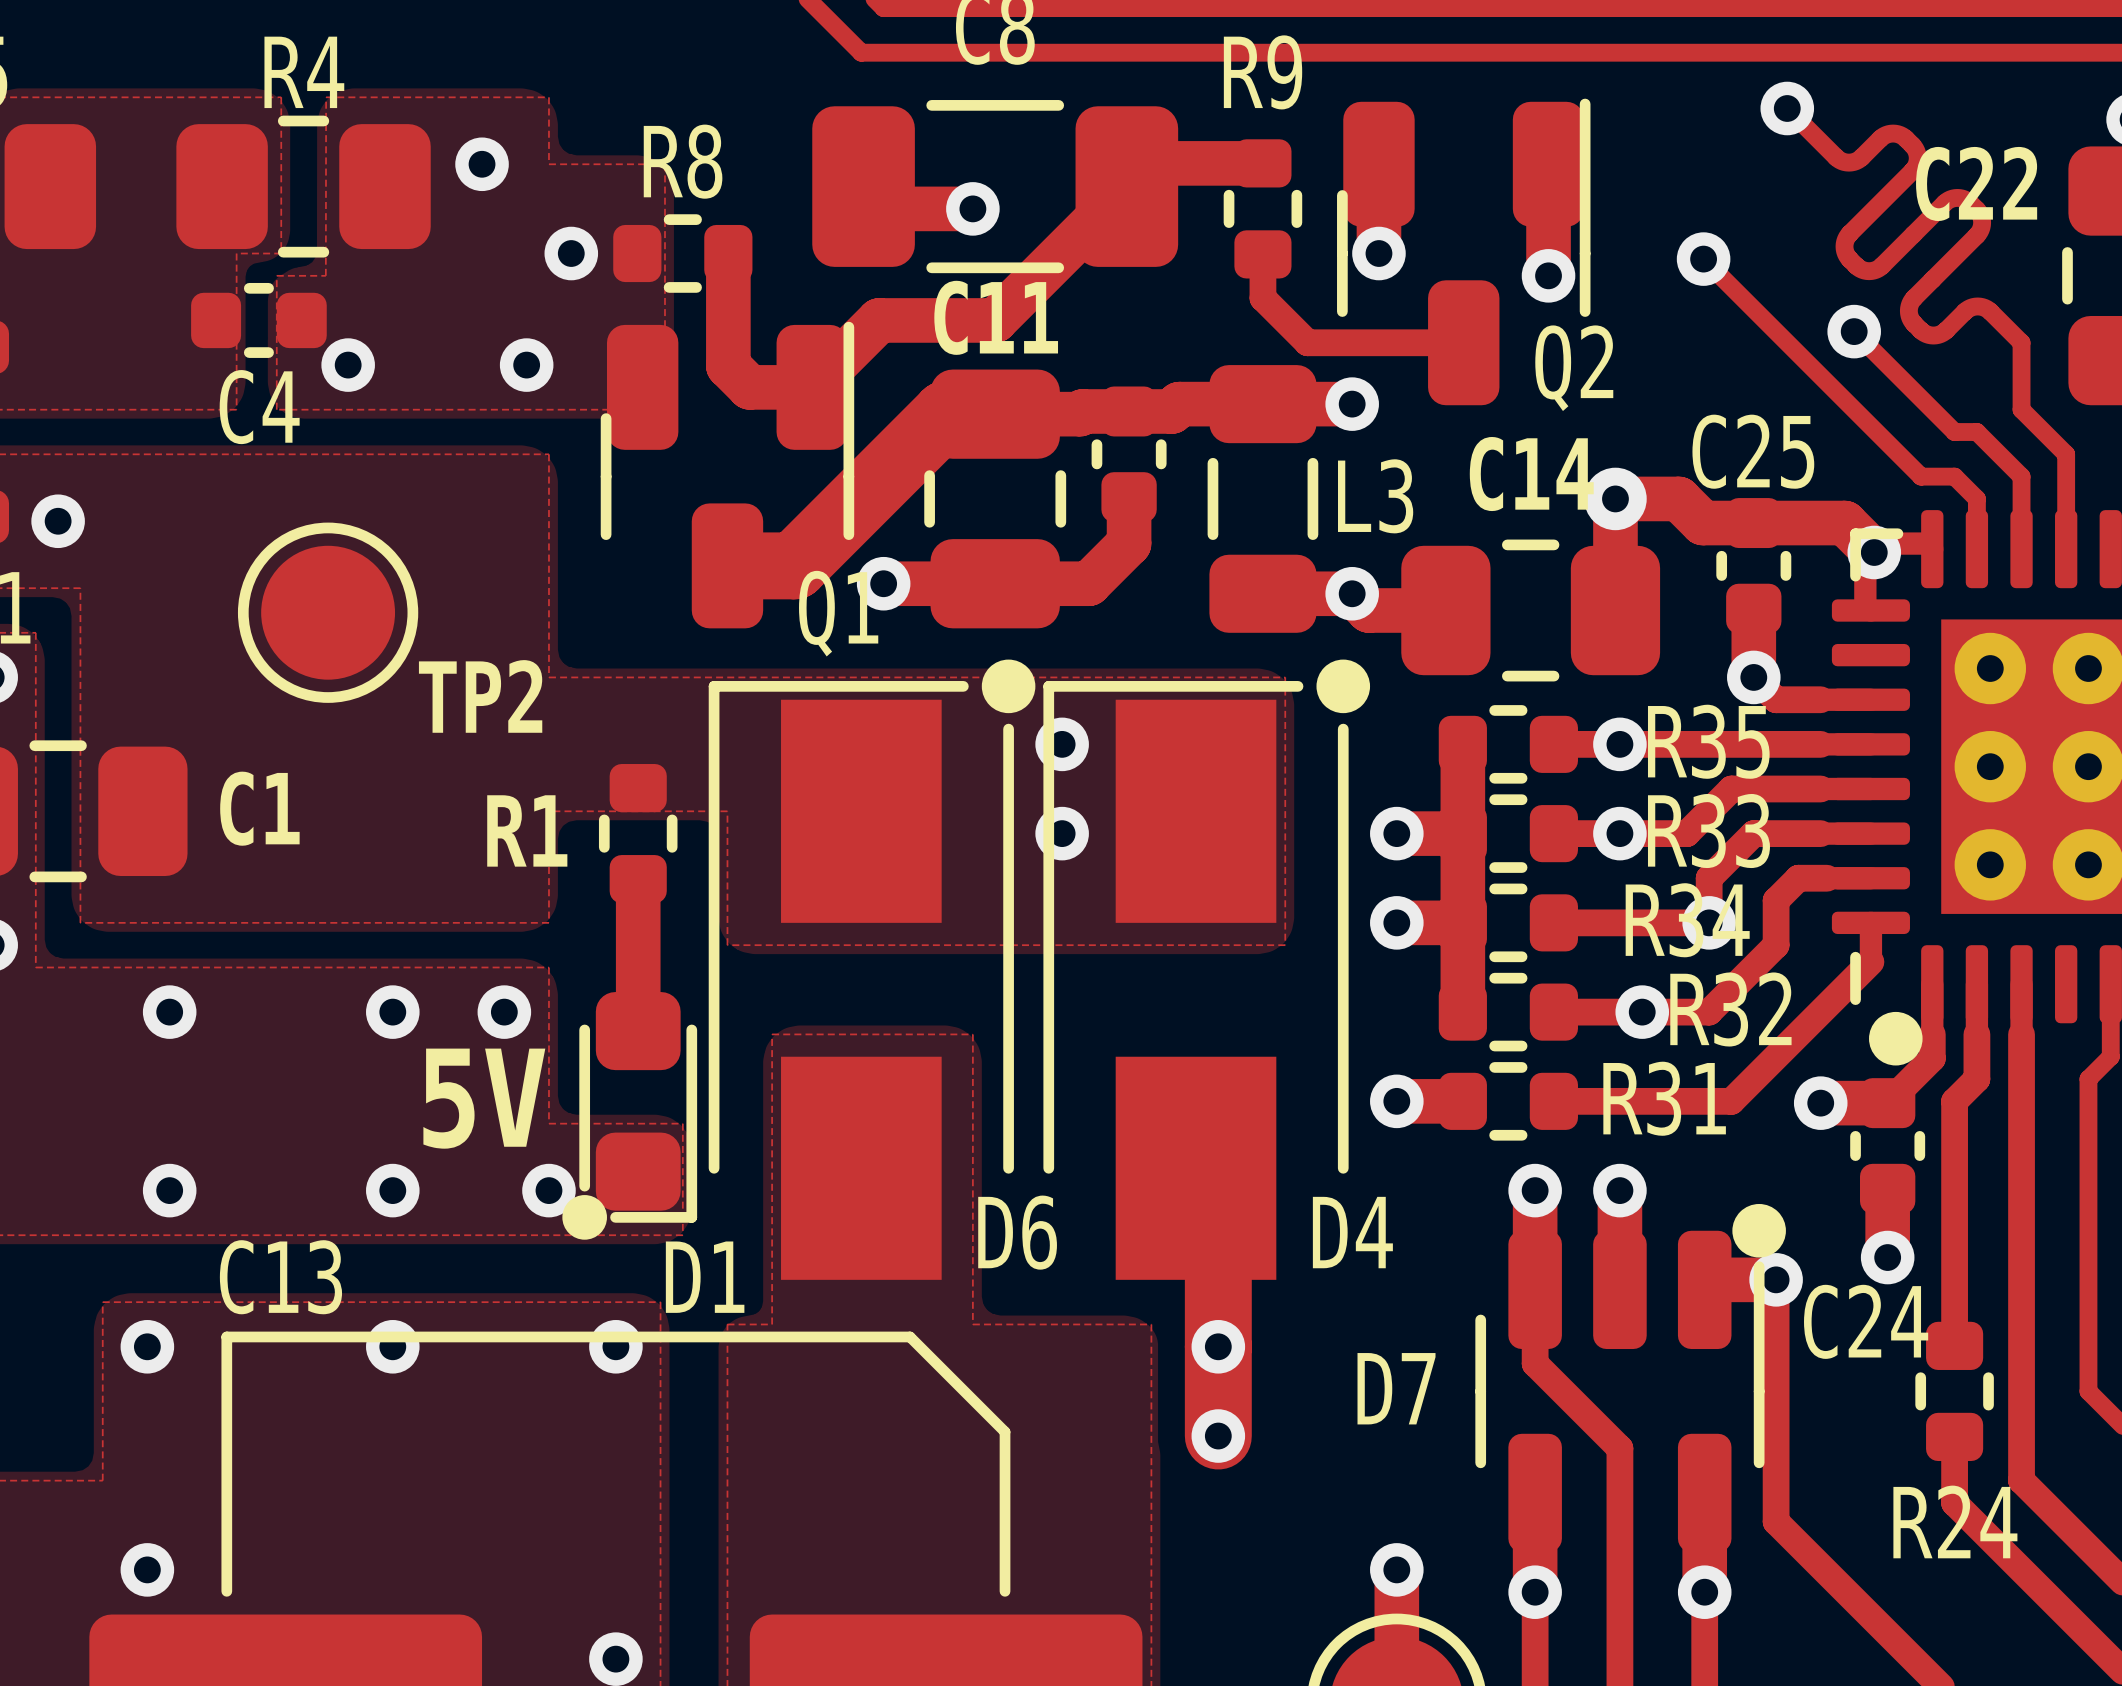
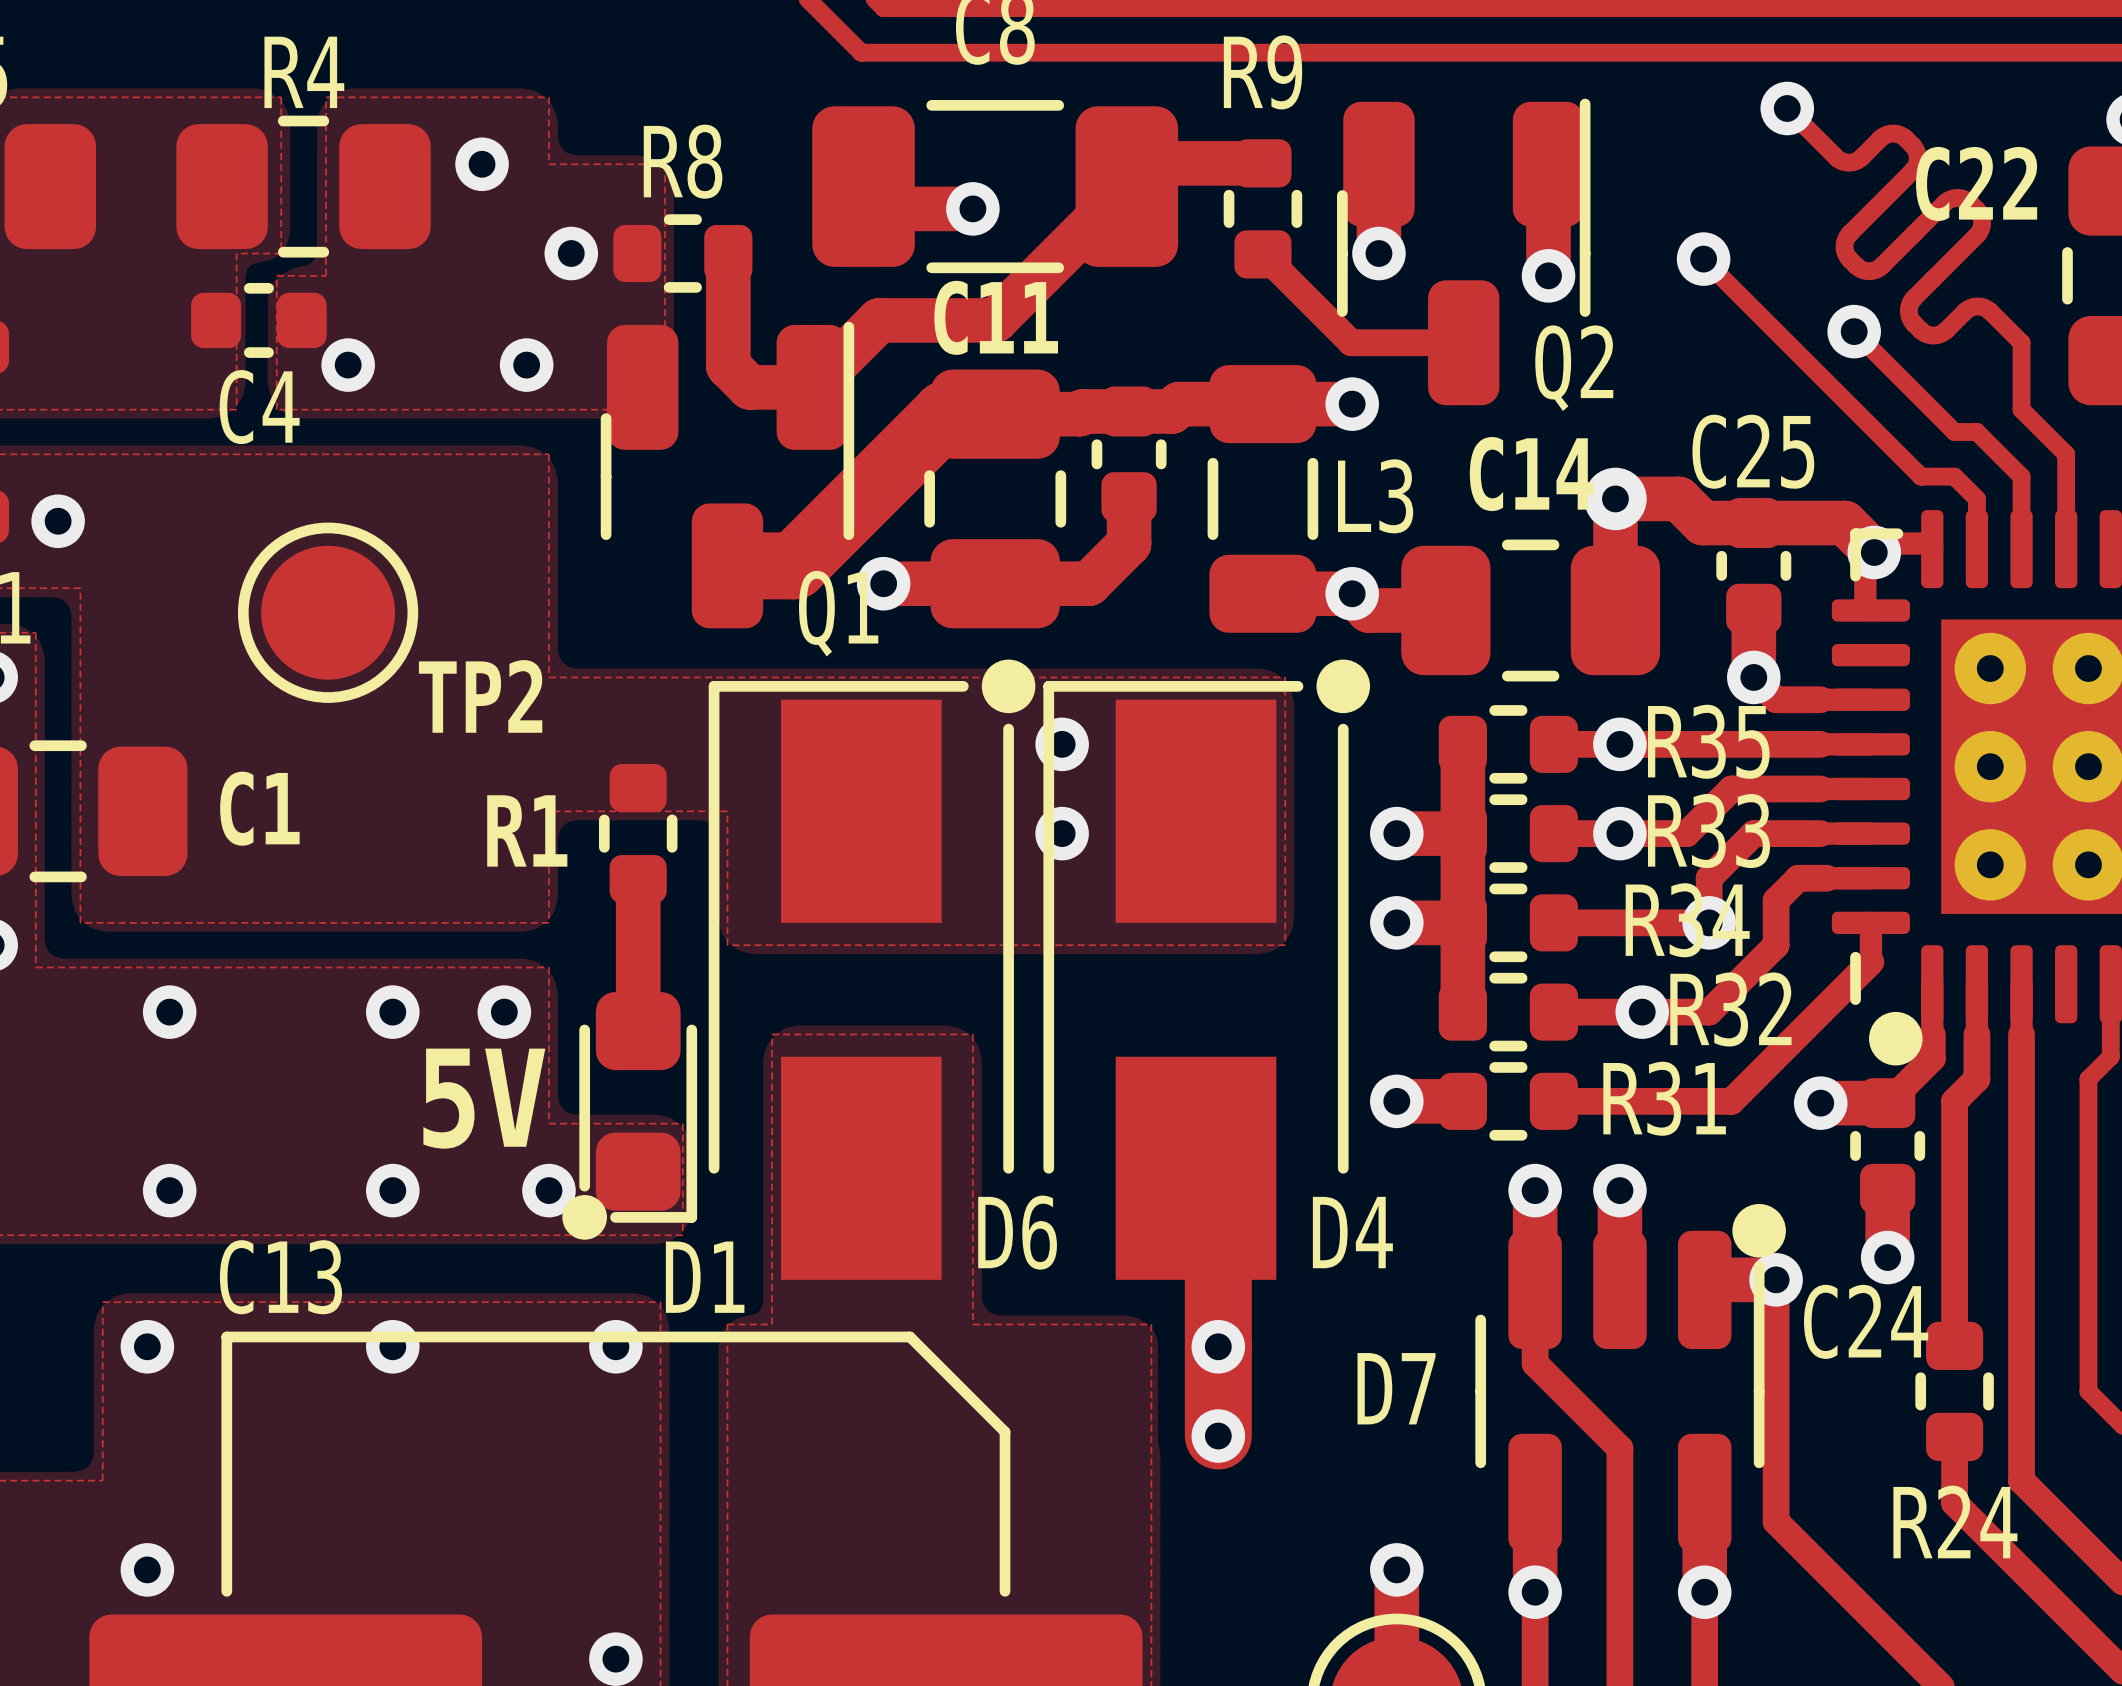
track: (1262, 254) (1262, 298) (1307, 342) (1351, 342) -> (1262, 254) (1351, 342)

